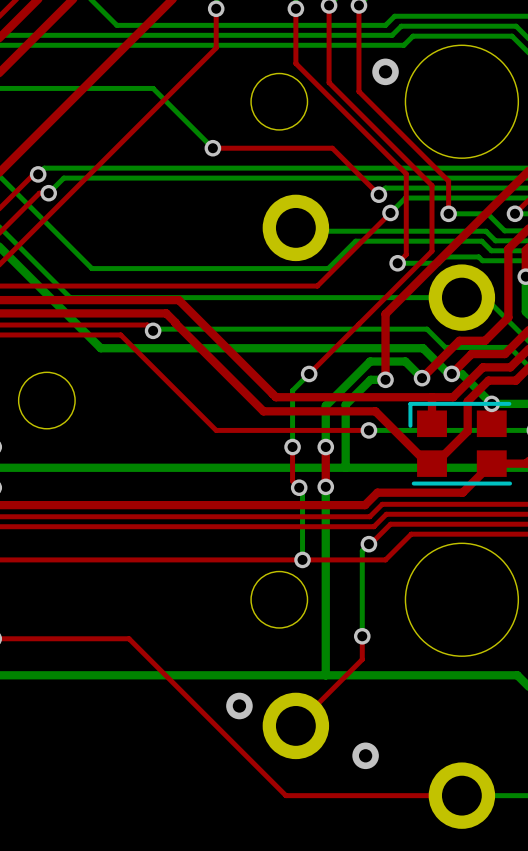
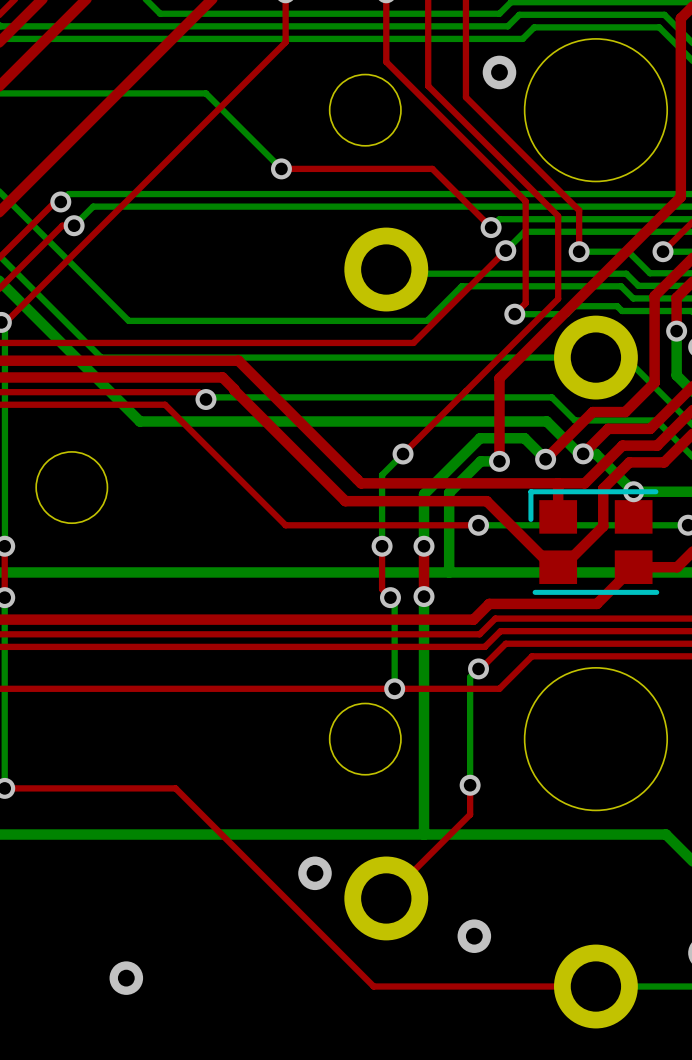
via: none -> (126, 978)

